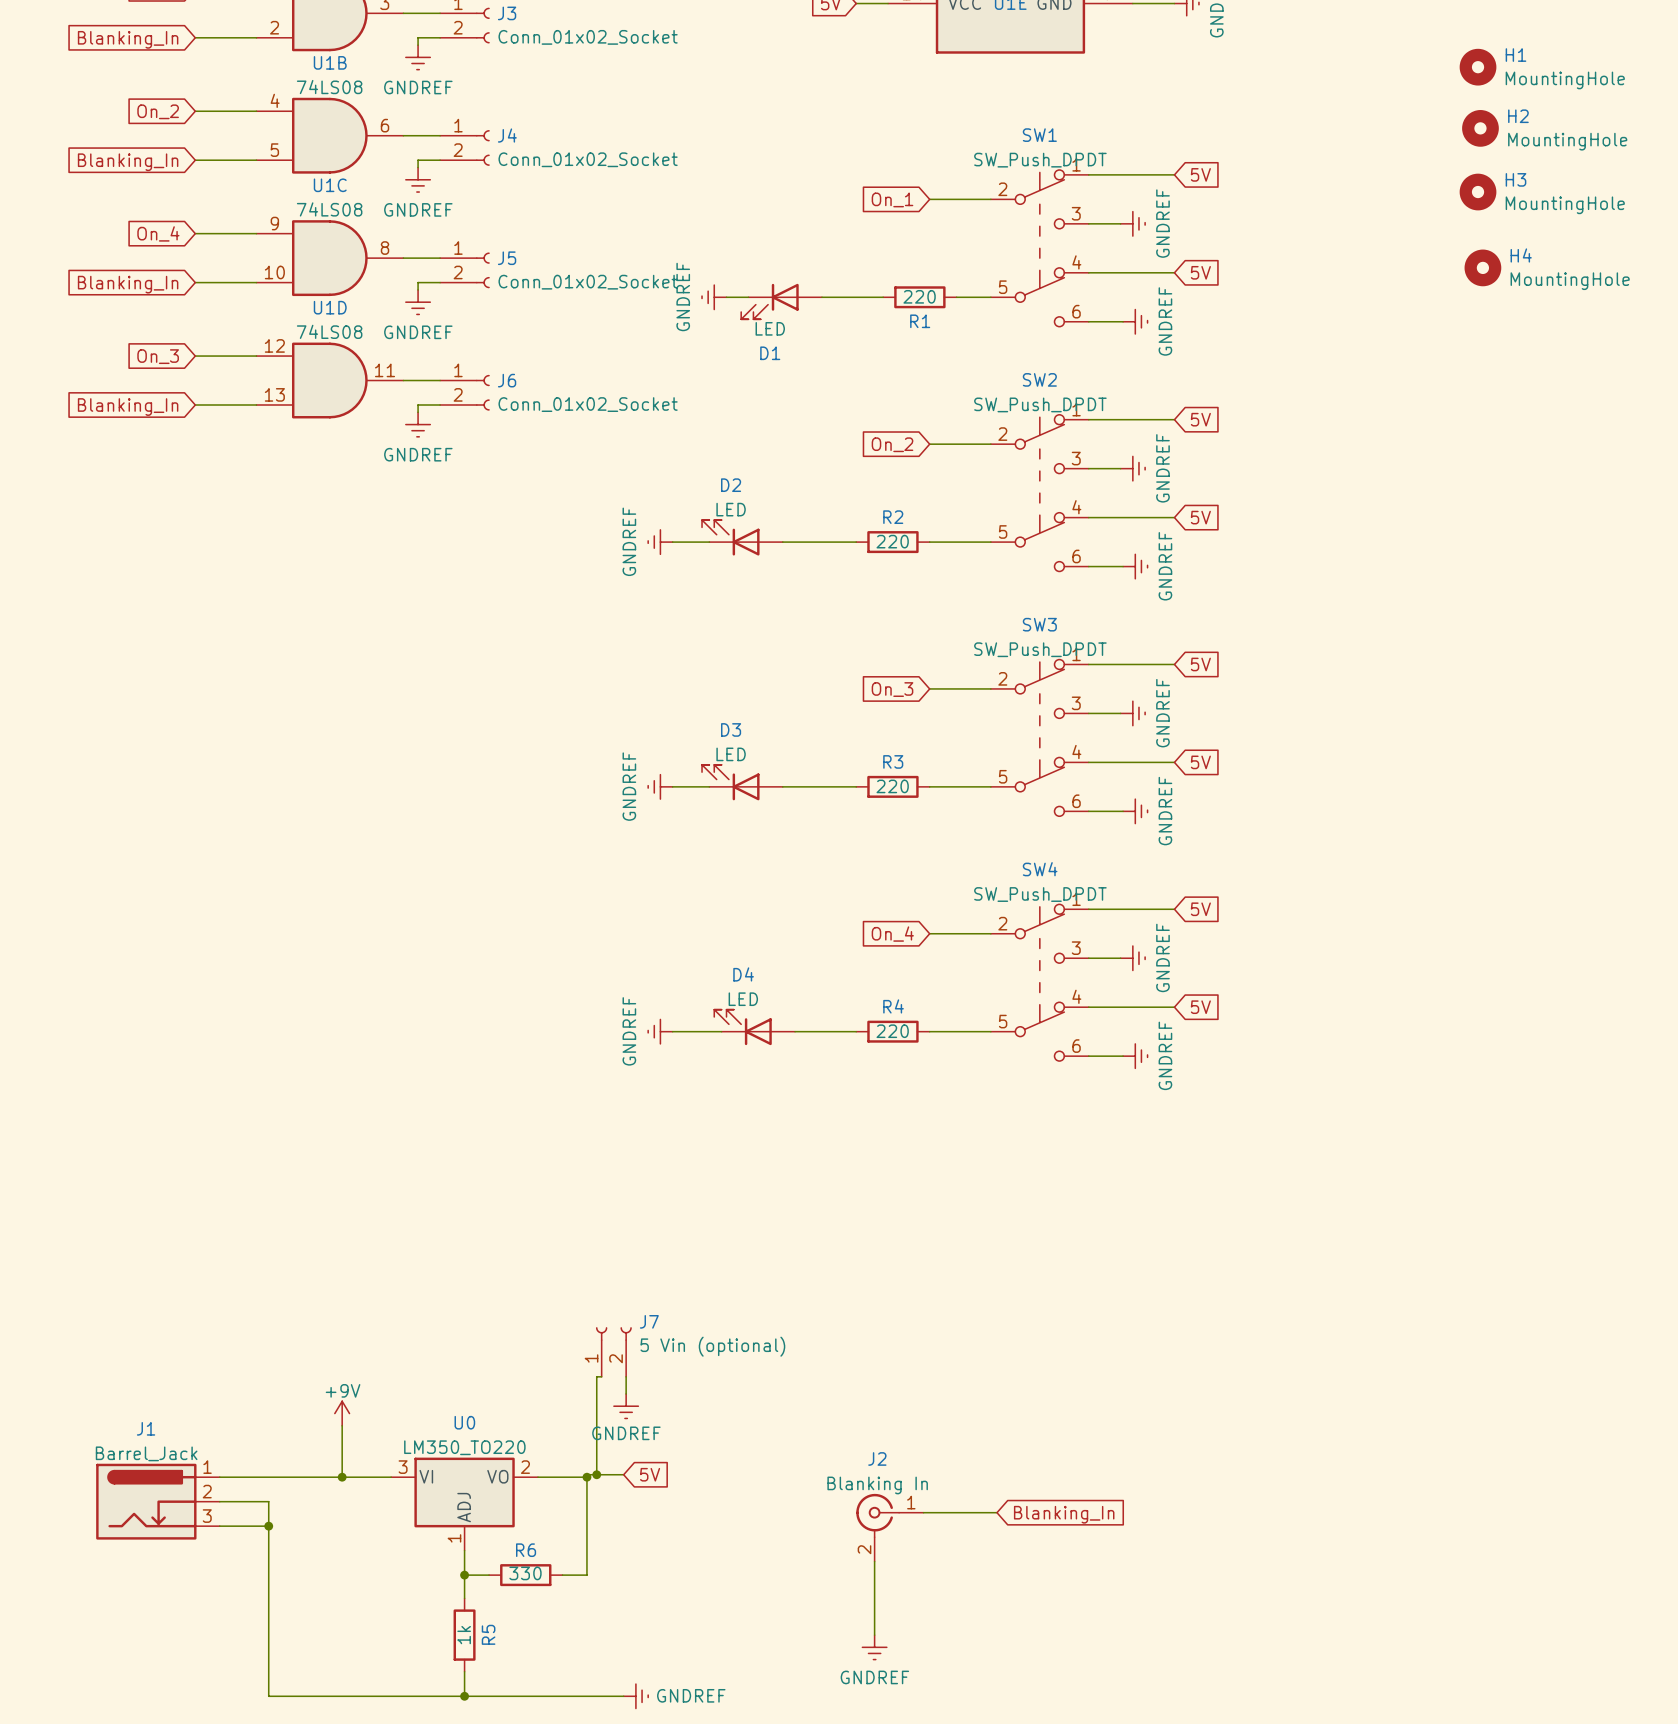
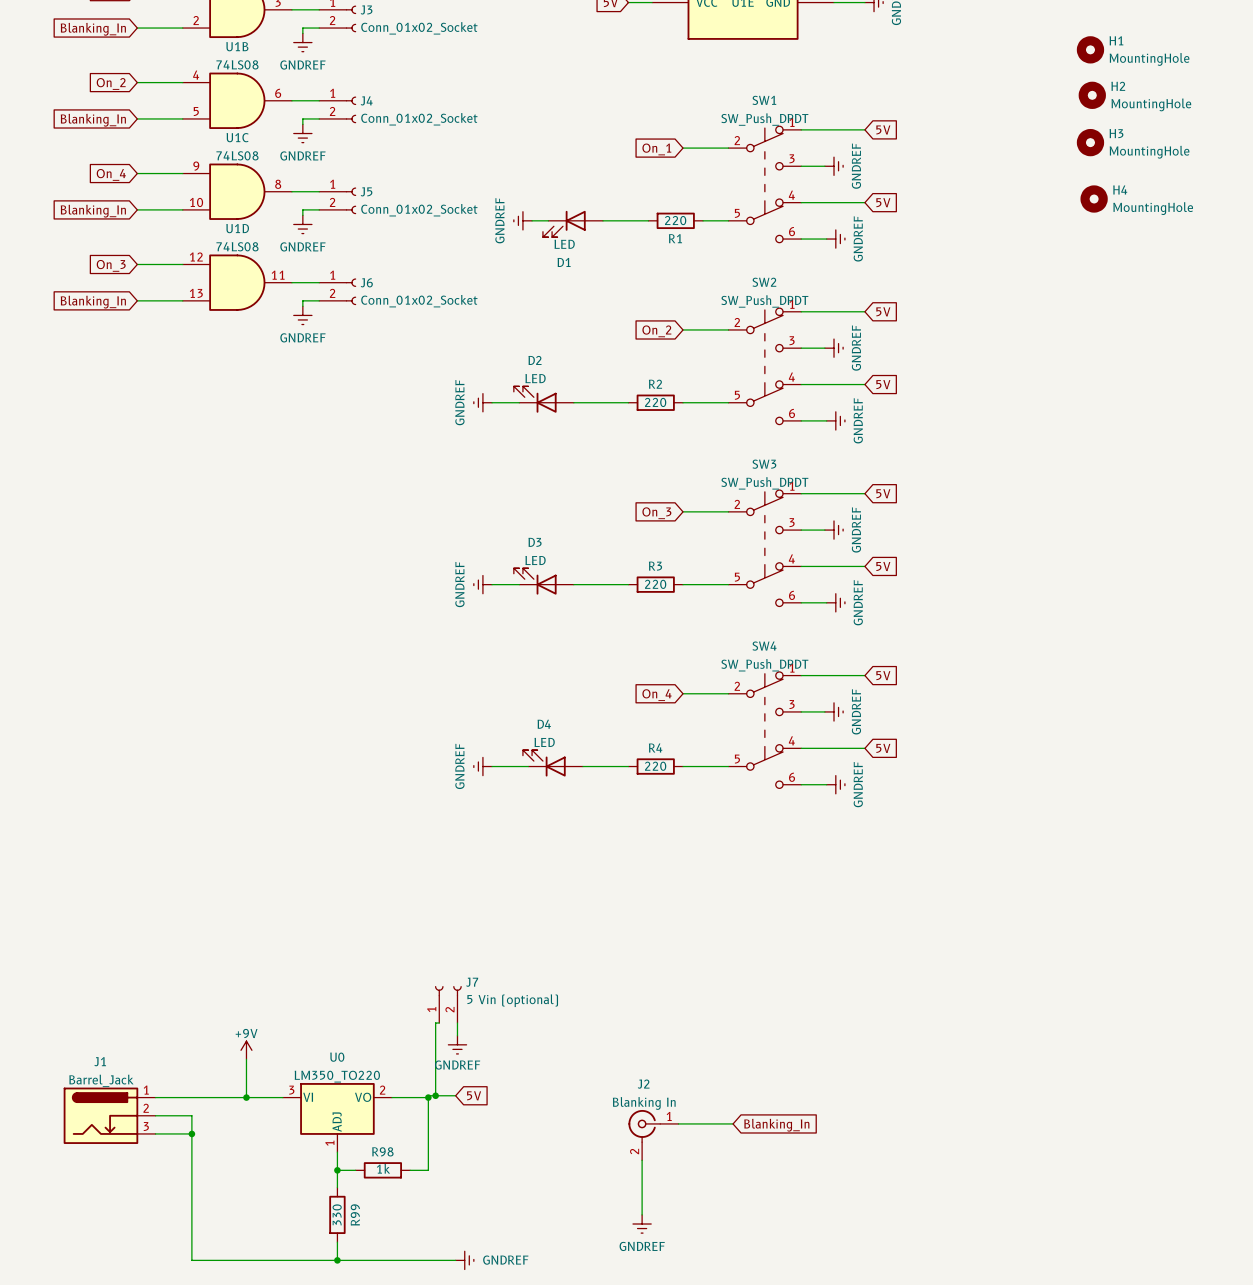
R6 name: R6 (526, 1550) -> R98 (382, 1151)
R6 value: 330 (525, 1573) -> 1k (383, 1168)
R5 name: R5 (488, 1634) -> R99 (355, 1214)
R5 value: 1k (464, 1635) -> 330 (337, 1214)

